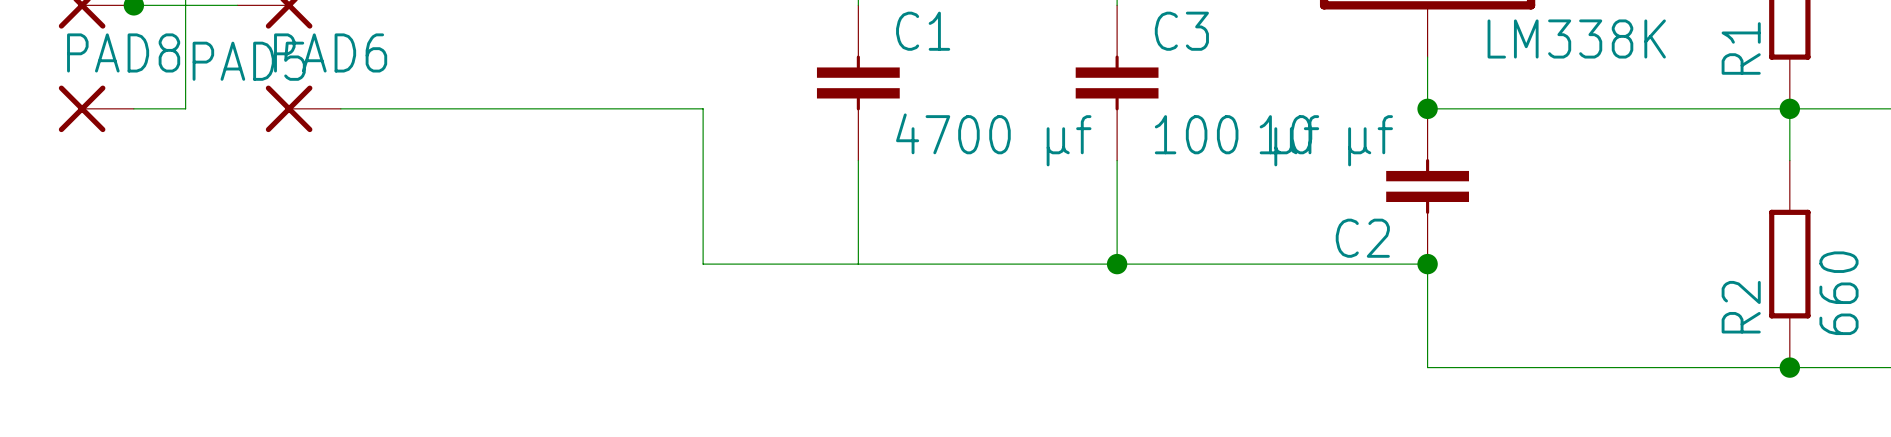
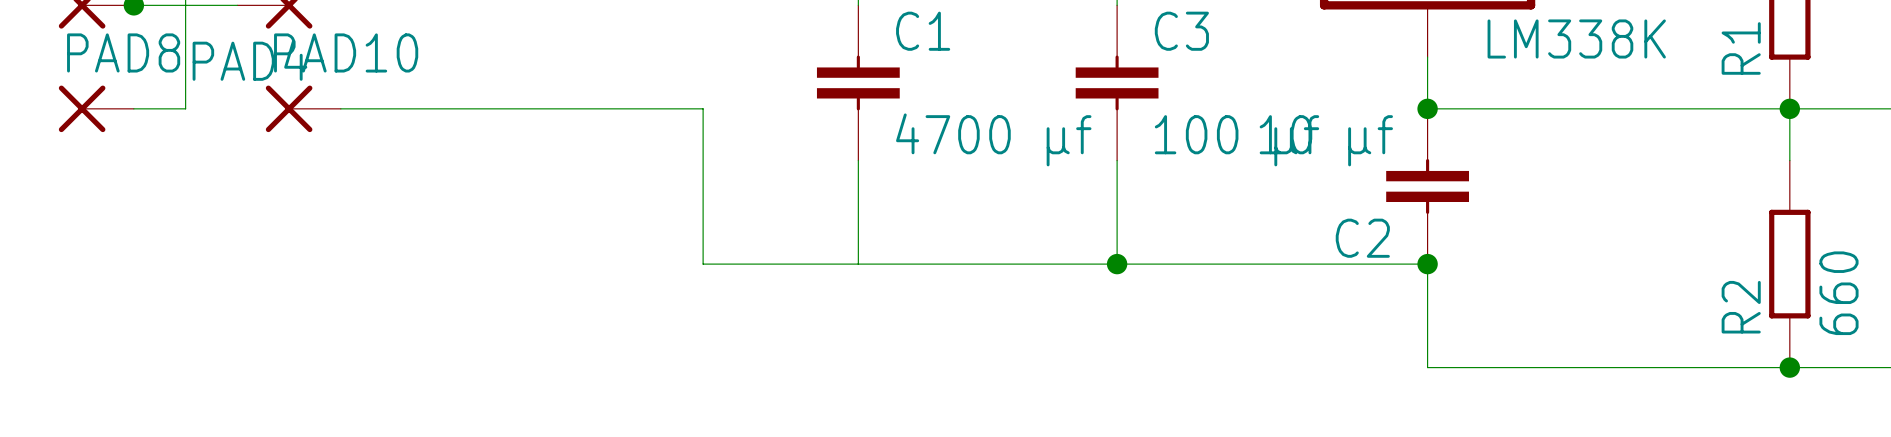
PAD6 name: PAD6 (330, 52) -> PAD10 (346, 52)
PAD5 name: PAD5 (249, 61) -> PAD4 (249, 60)

